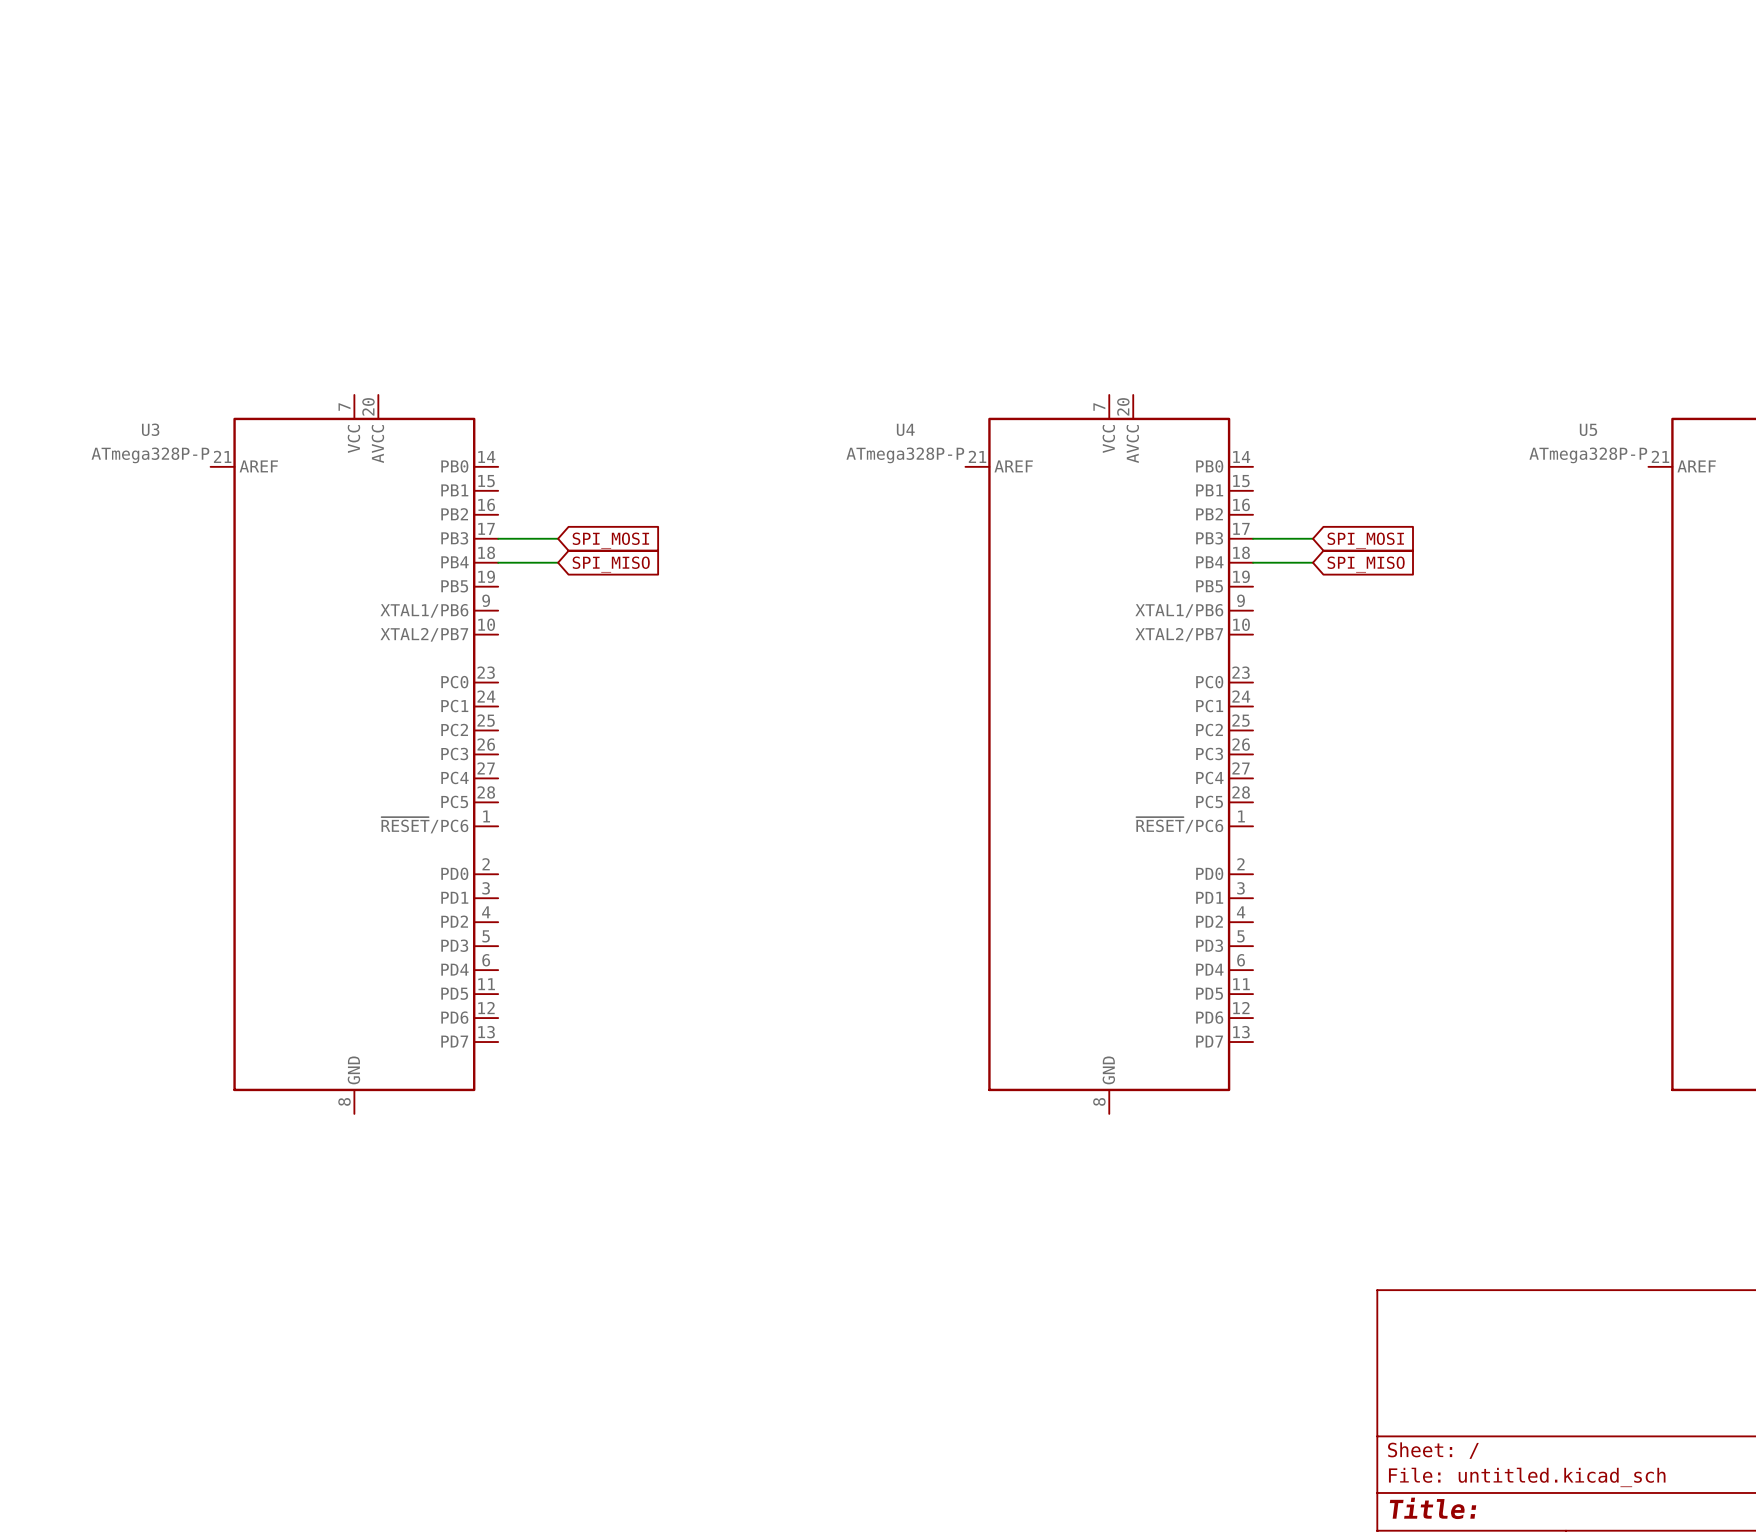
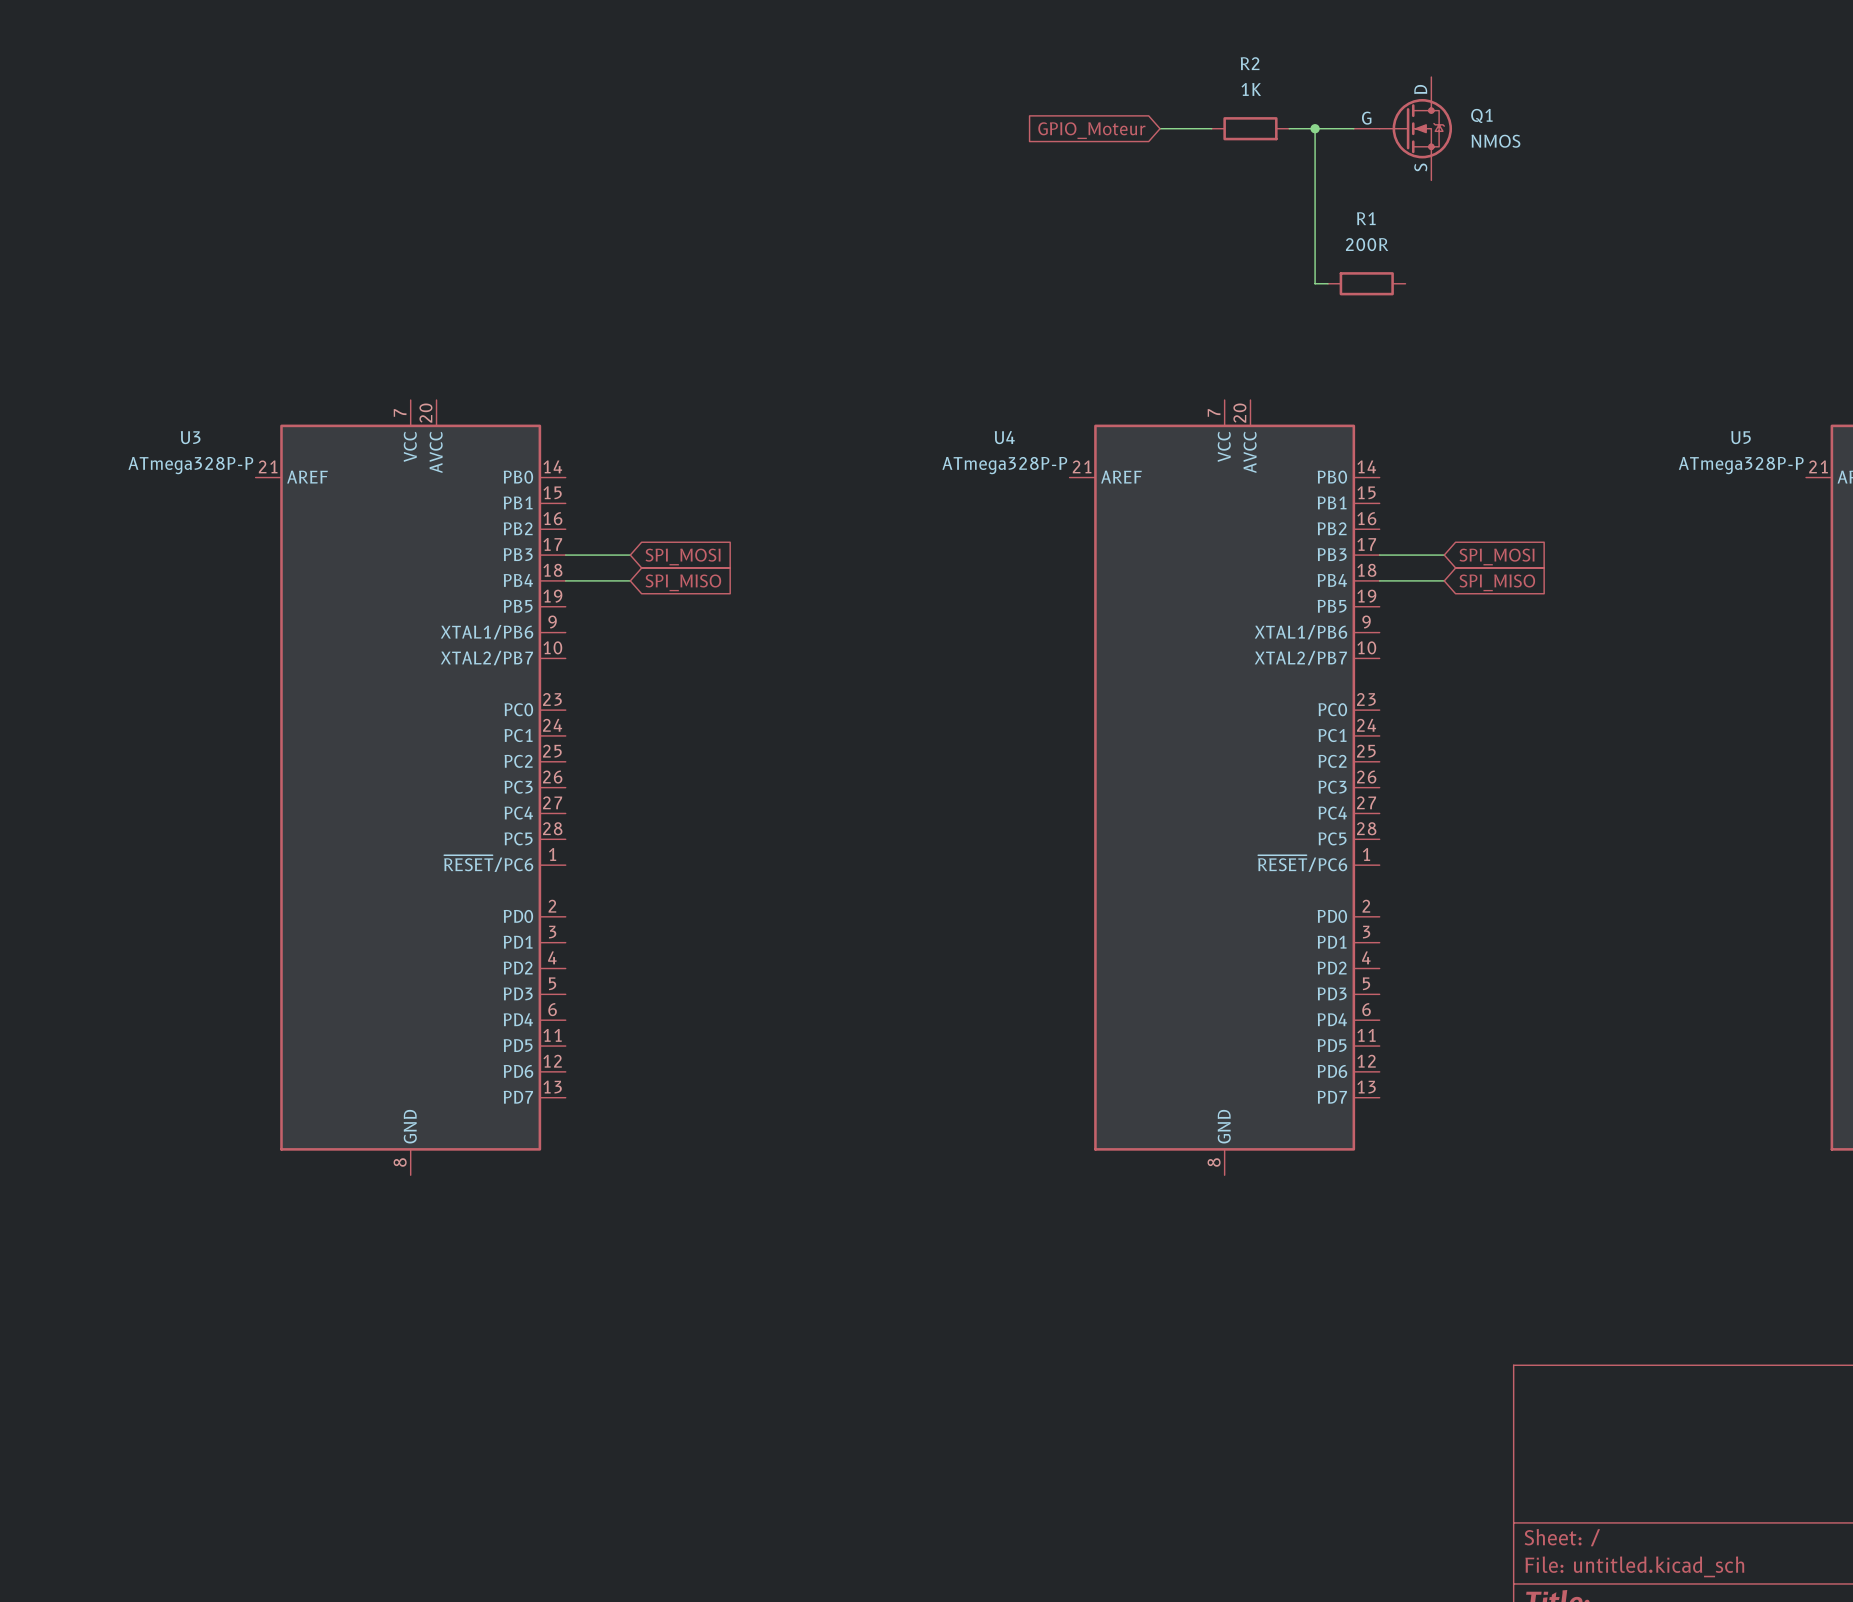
wire: none -> (1160, 128) (1211, 128)
R2: none -> 1K (1250, 128)
wire: none -> (1289, 128) (1353, 128)
wire: none -> (1315, 128) (1315, 283) (1327, 283)
junction: none -> (1315, 128)
Q1: none -> NMOS (1402, 128)
global label: none -> GPIO_Moteur (1091, 130)
R1: none -> 200R (1366, 283)

